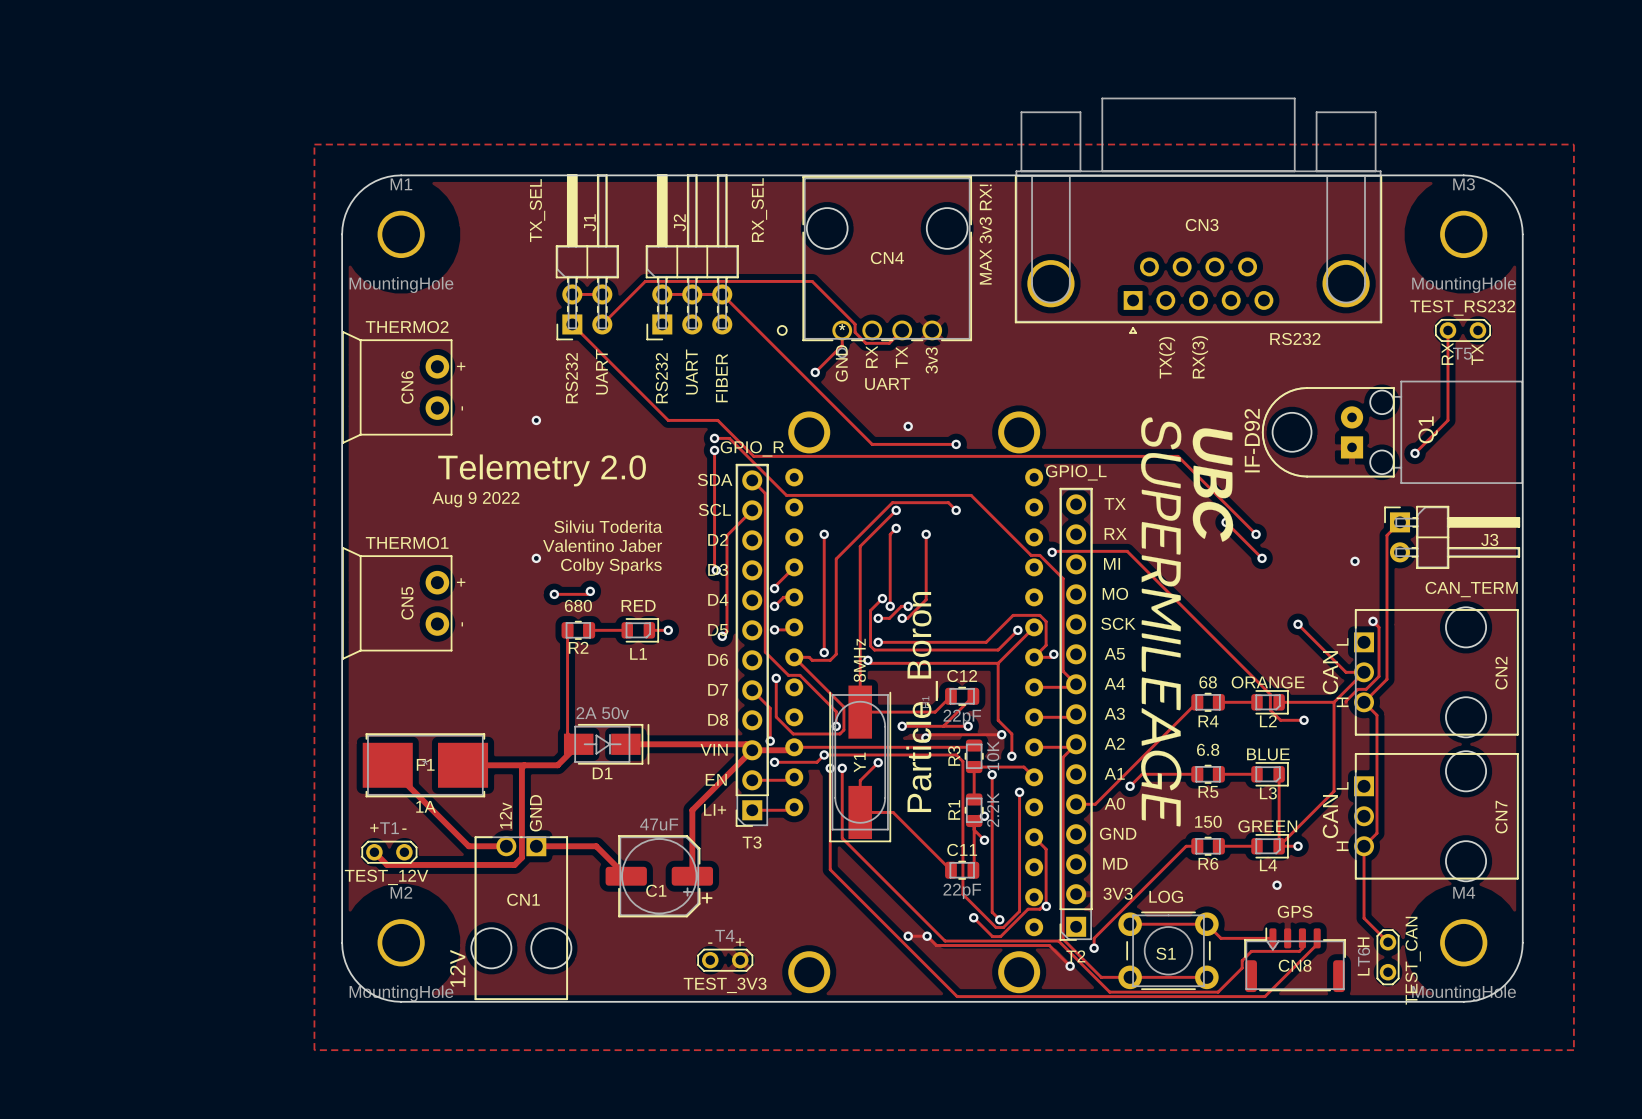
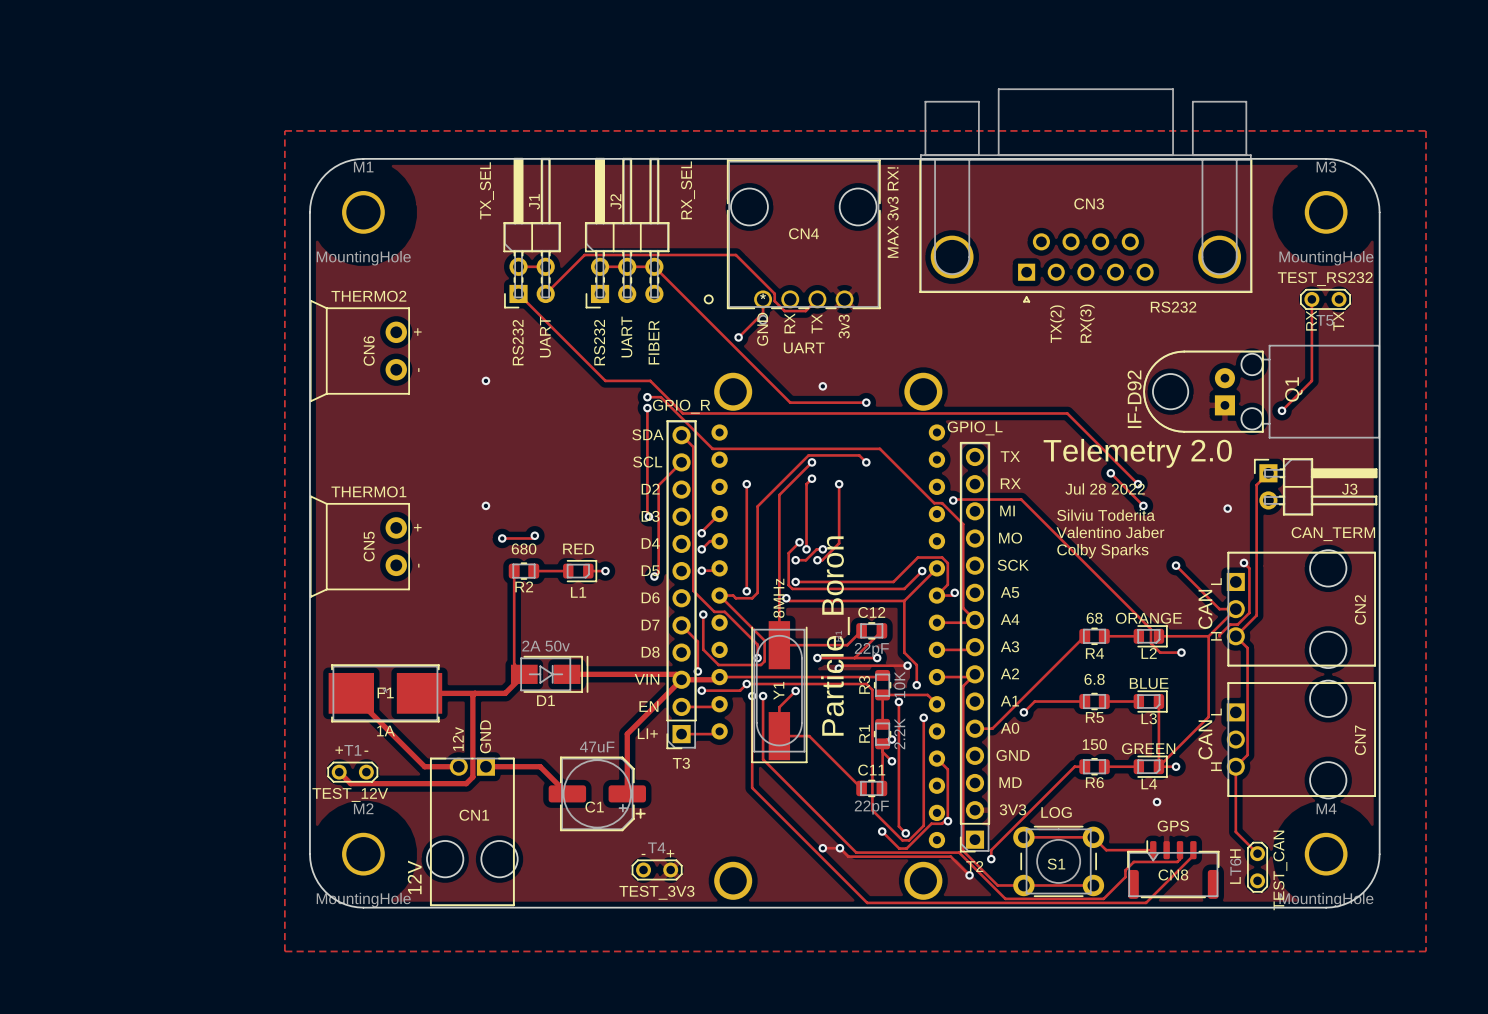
drawing: [1141, 417, 1234, 827] -> none
text: Telemetry 2.0 (542, 470) -> none
text: Aug 9 2022 (475, 499) -> none
text: none -> Telemetry 2.0 (1137, 453)
text: Silviu Toderita (608, 526) -> none
text: none -> Jul 28 2022 (1105, 488)
text: Valentino Jaber (602, 545) -> none
text: Colby Sparks (611, 566) -> none
text: none -> Silviu Toderita (1106, 515)
text: none -> Valentino Jaber (1110, 532)
text: none -> Colby Sparks (1102, 551)

